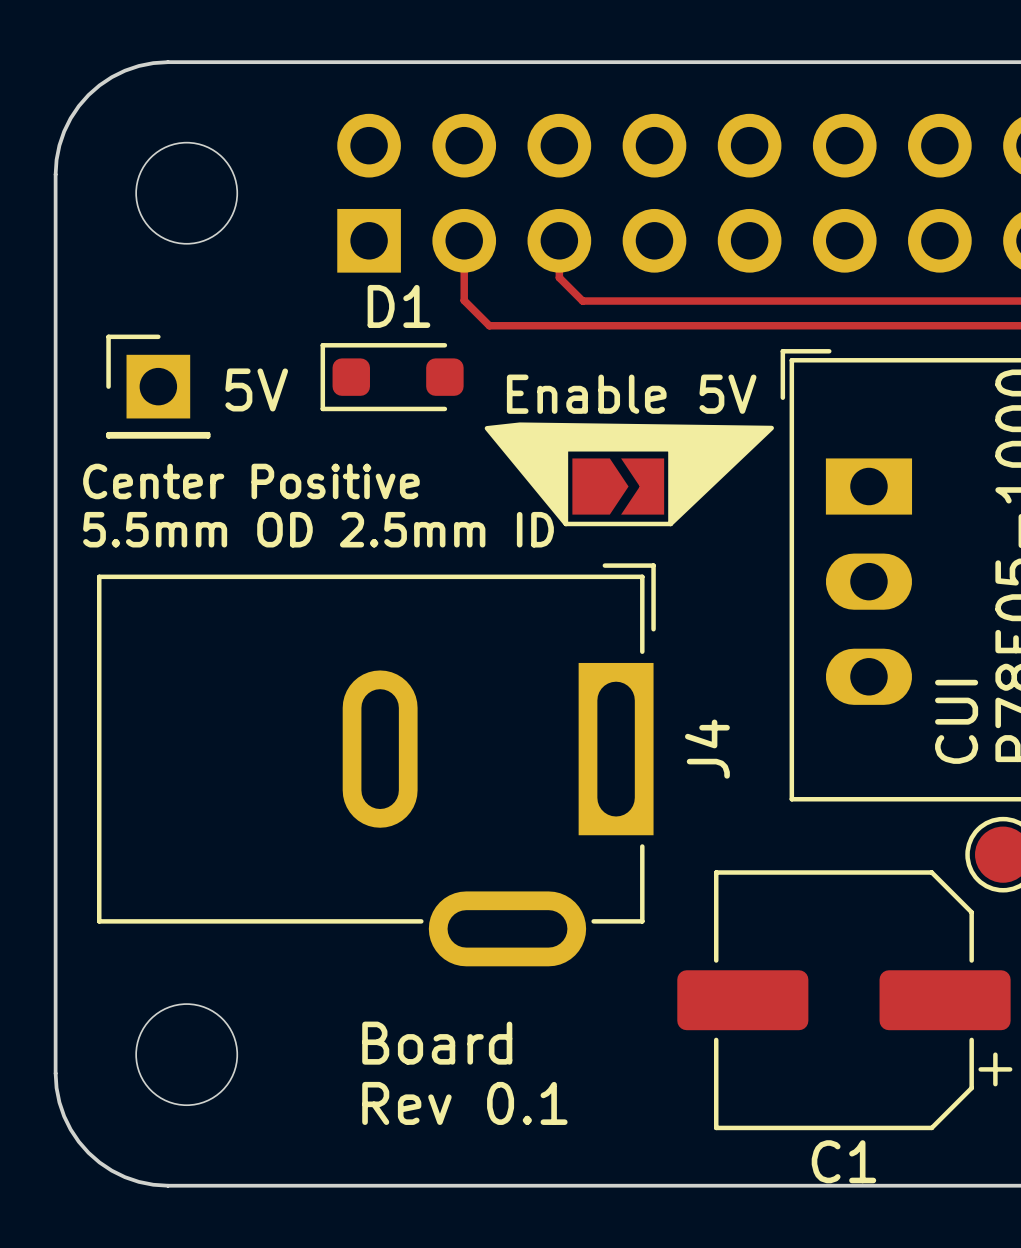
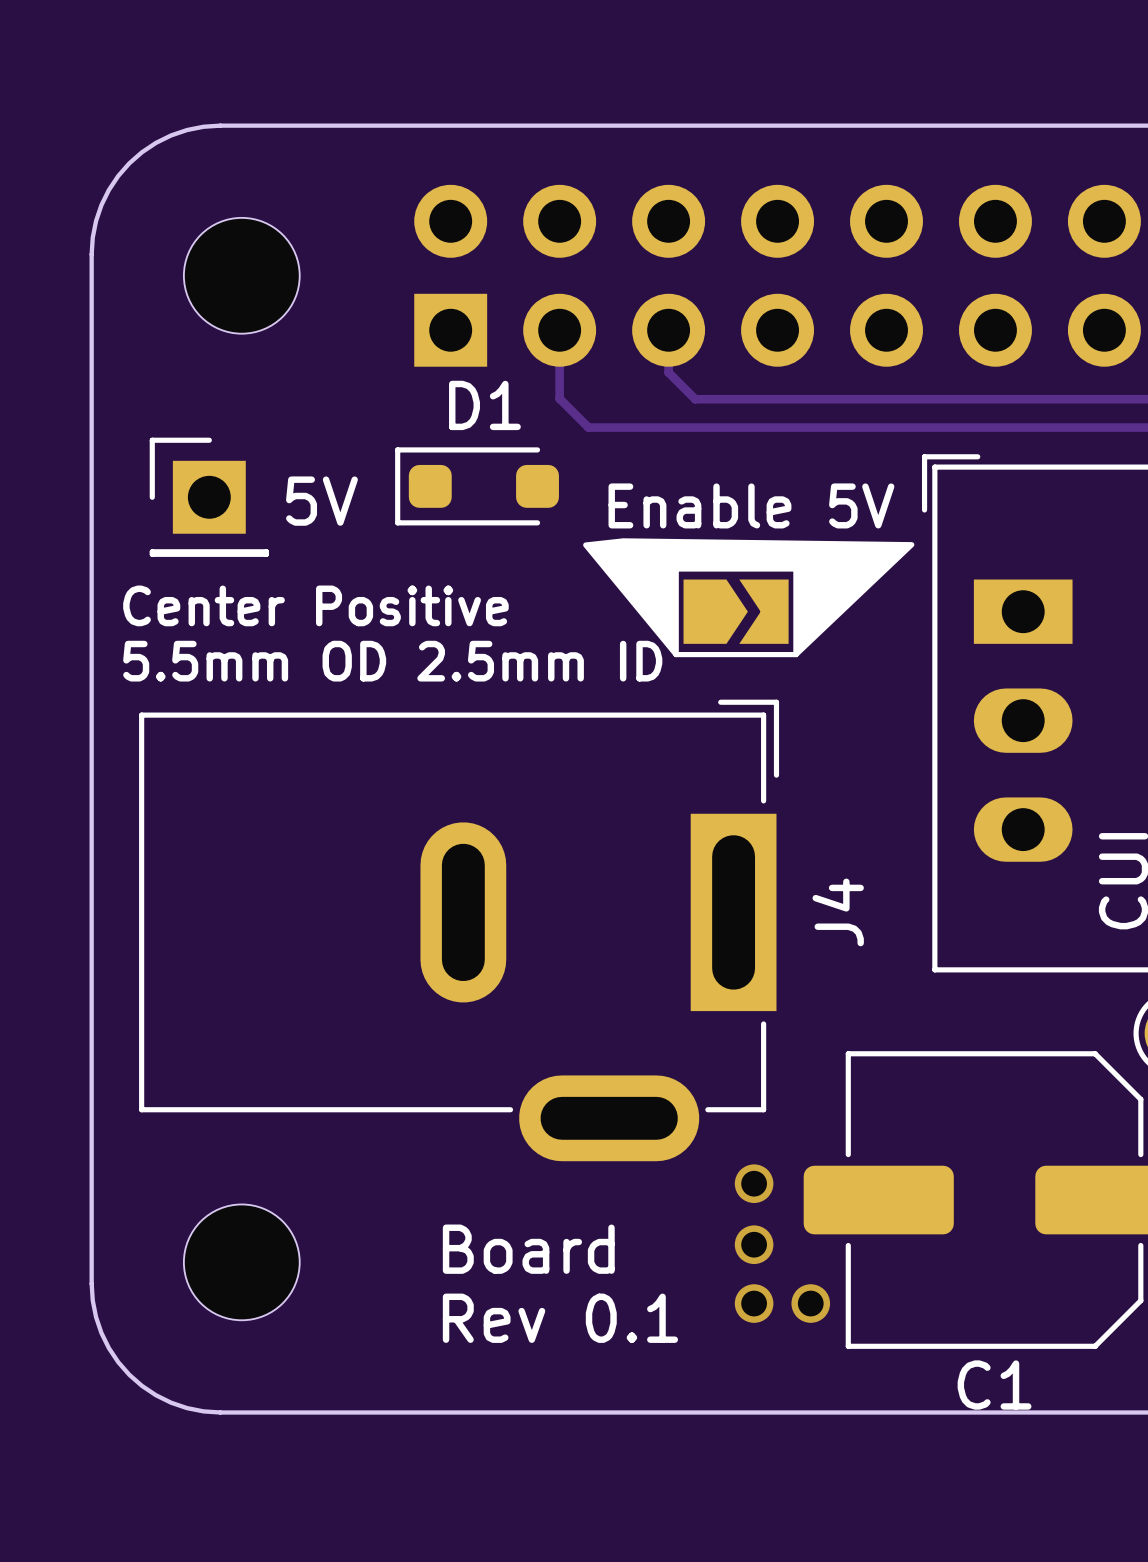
via: none -> (754, 1183)
via: none -> (754, 1244)
via: none -> (754, 1303)
via: none -> (810, 1303)

